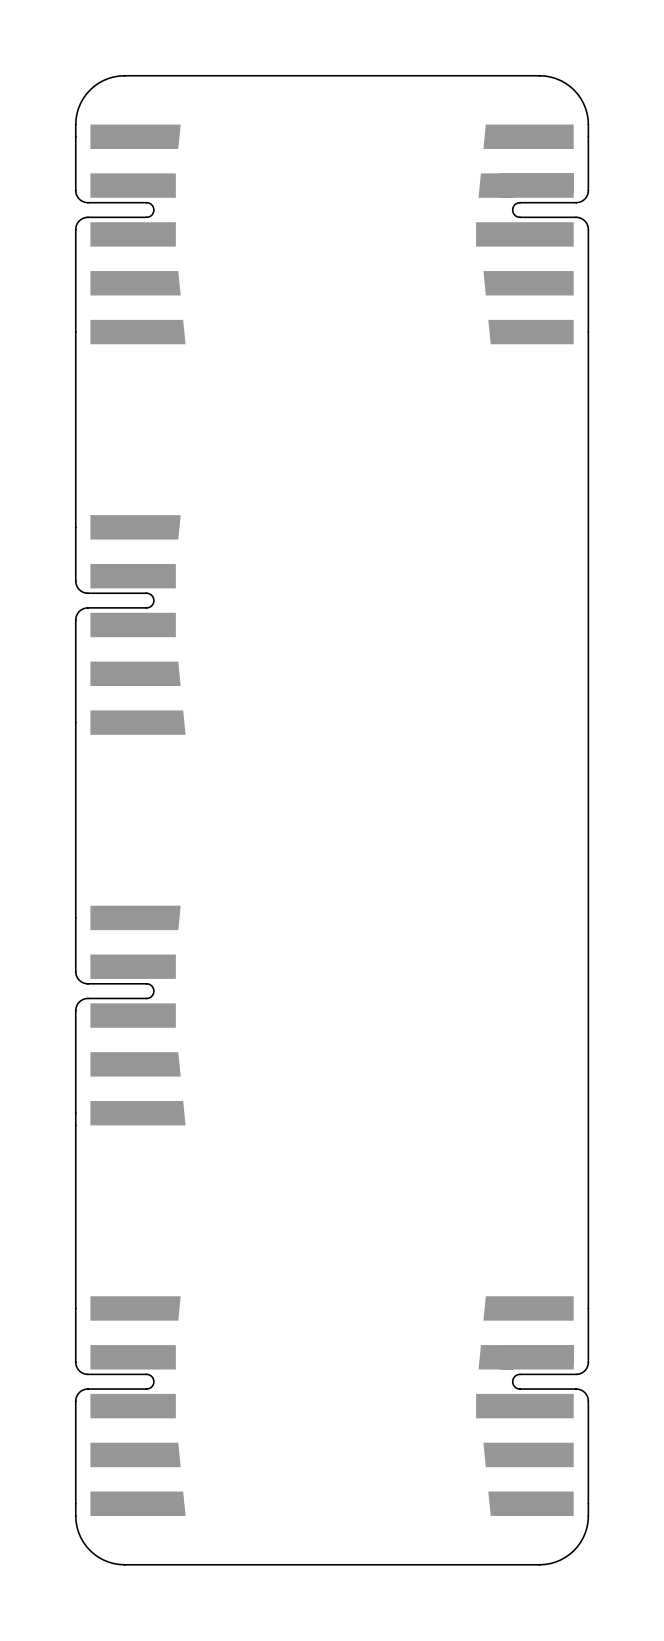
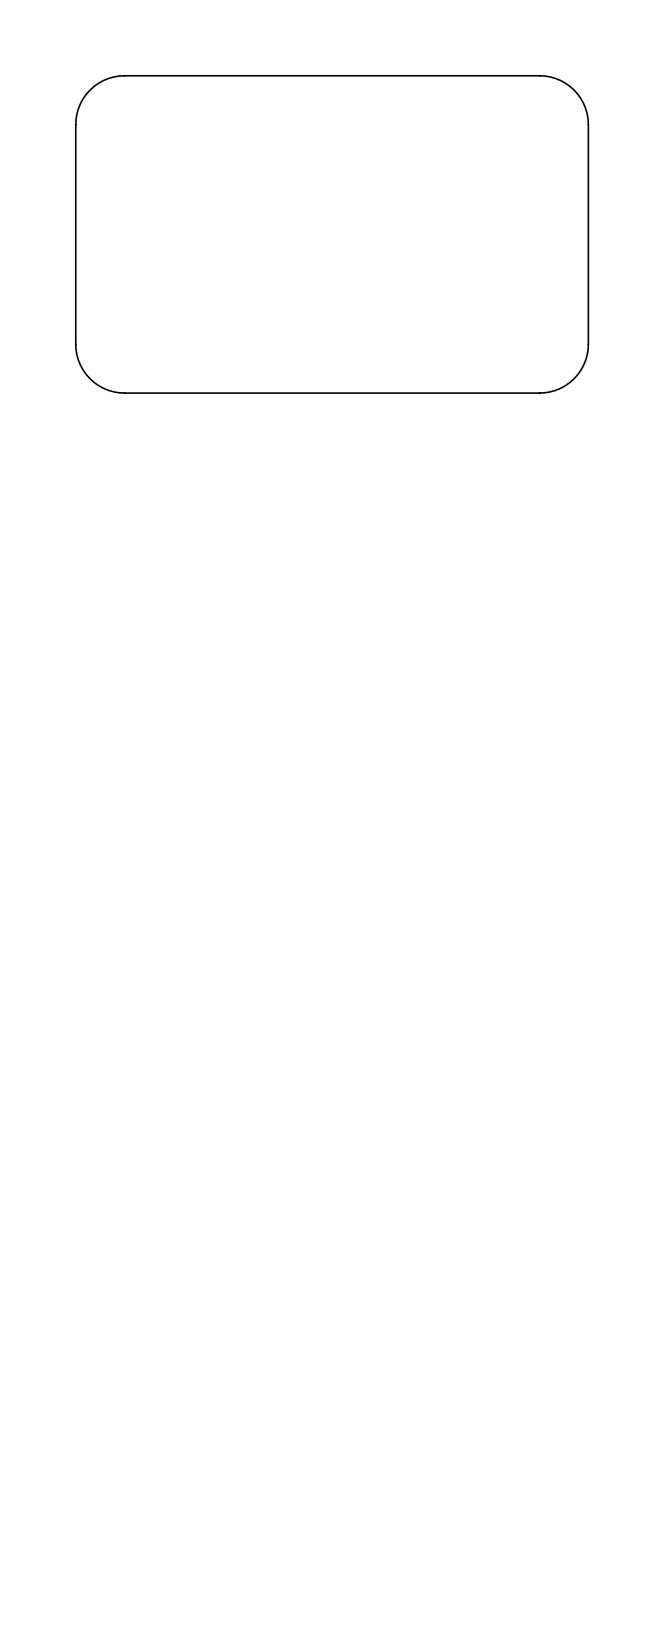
board edge: none -> (588, 136) (588, 332)
part: (130, 234) -> none
part: (532, 234) -> none
board edge: (75, 344) (75, 527) -> (75, 344) (78, 360) (90, 378) (108, 390) (124, 393) (545, 392) (560, 388) (574, 378) (583, 365) (588, 344)
board edge: (588, 344) (588, 1308) -> none
part: (130, 624) -> none
board edge: (75, 722) (75, 917) -> (75, 136) (75, 332)
part: (130, 1015) -> none
board edge: (75, 1113) (75, 1308) -> none
part: (130, 1406) -> none
part: (532, 1406) -> none
board edge: (588, 1503) (587, 1526) (577, 1546) (560, 1559) (539, 1564) (119, 1564) (103, 1559) (86, 1546) (76, 1526) (75, 1503) -> none

